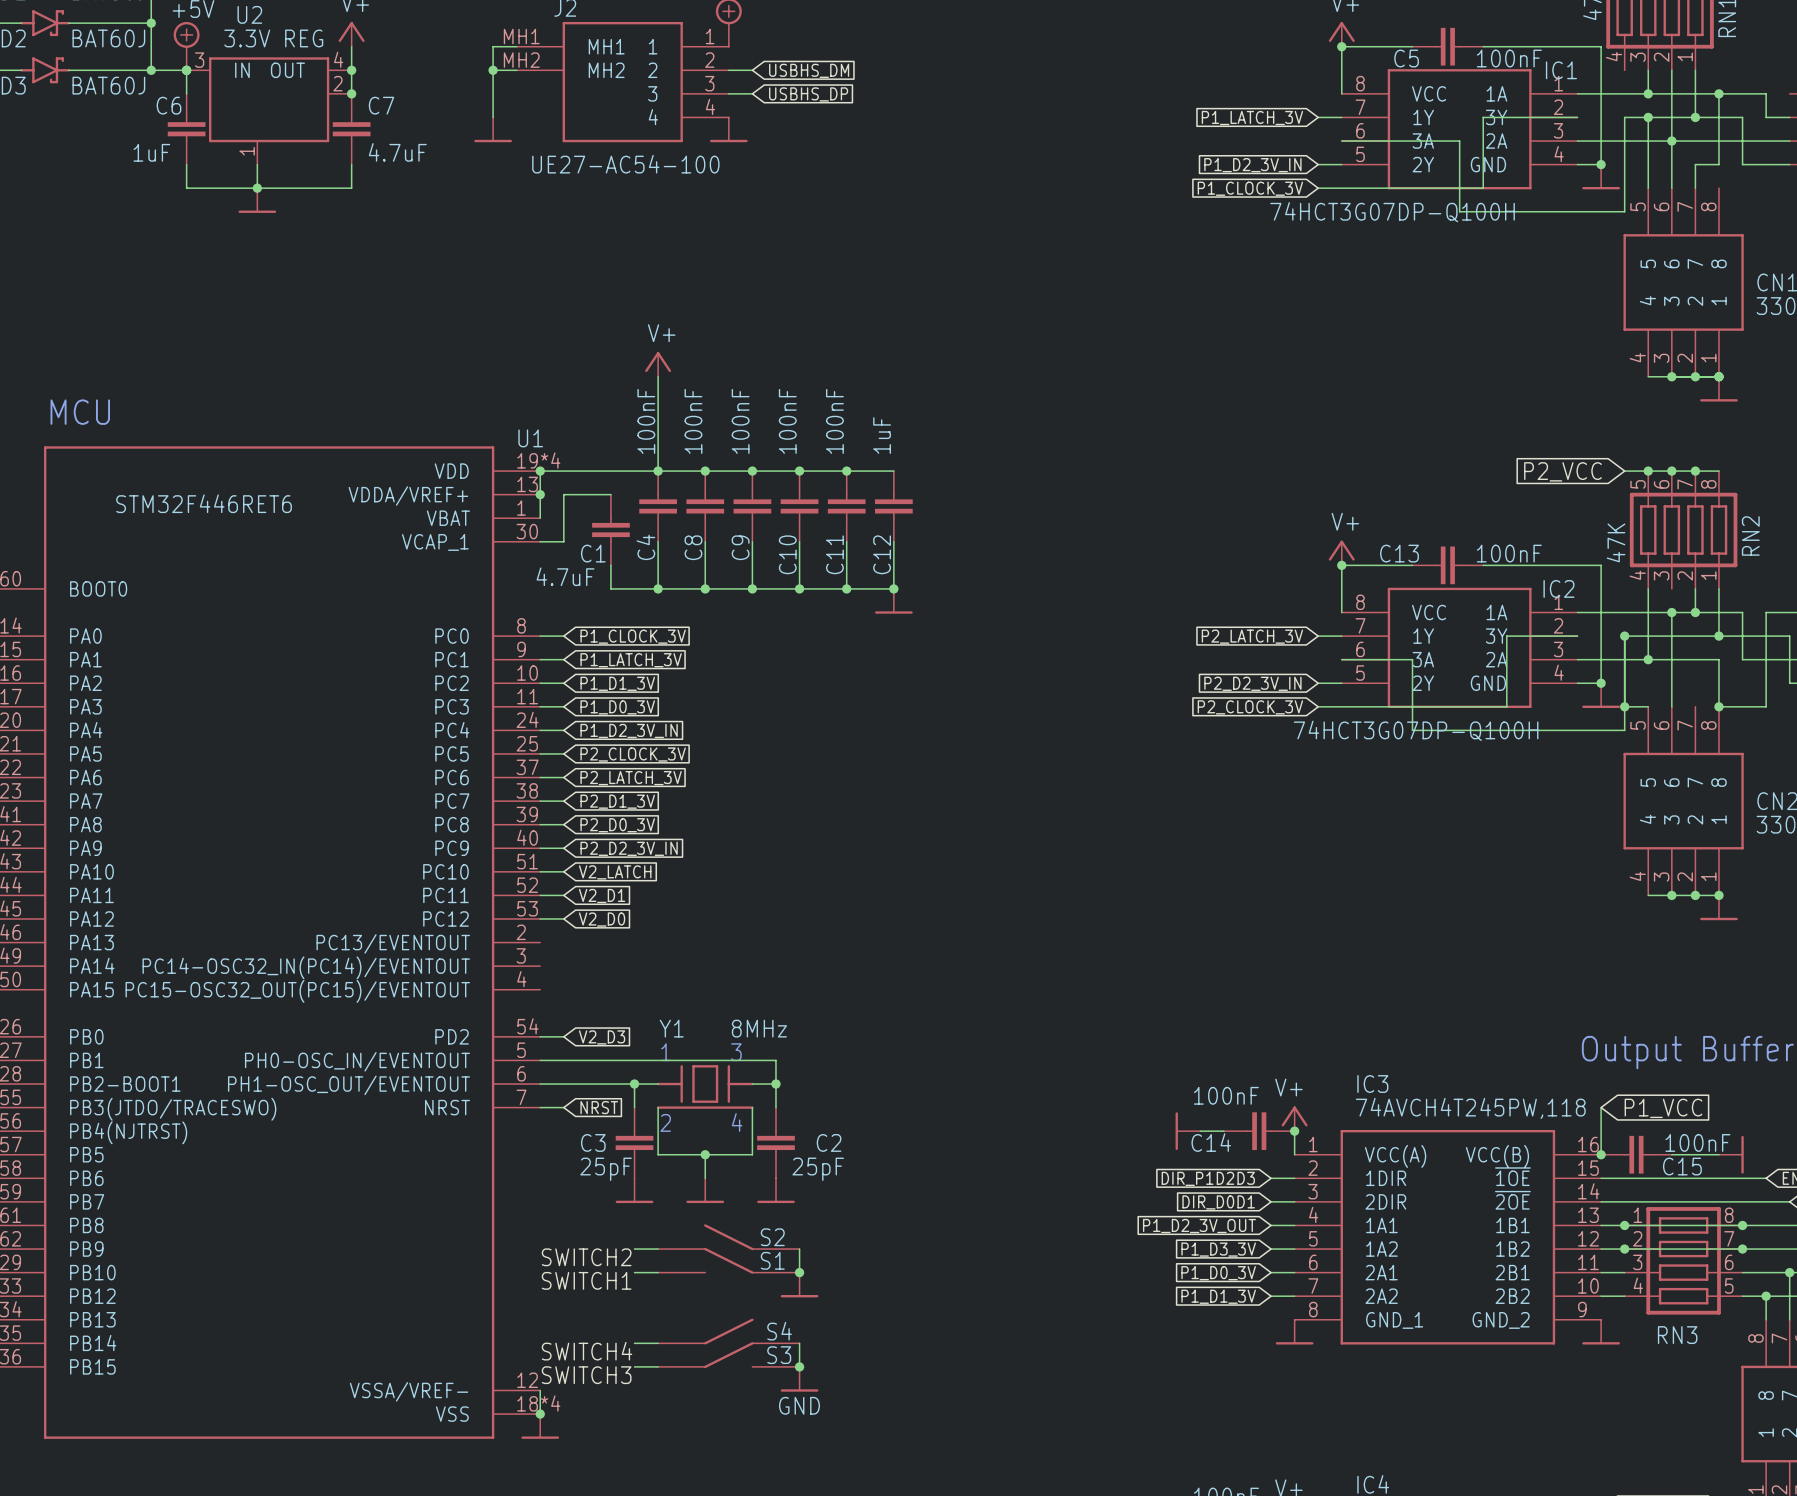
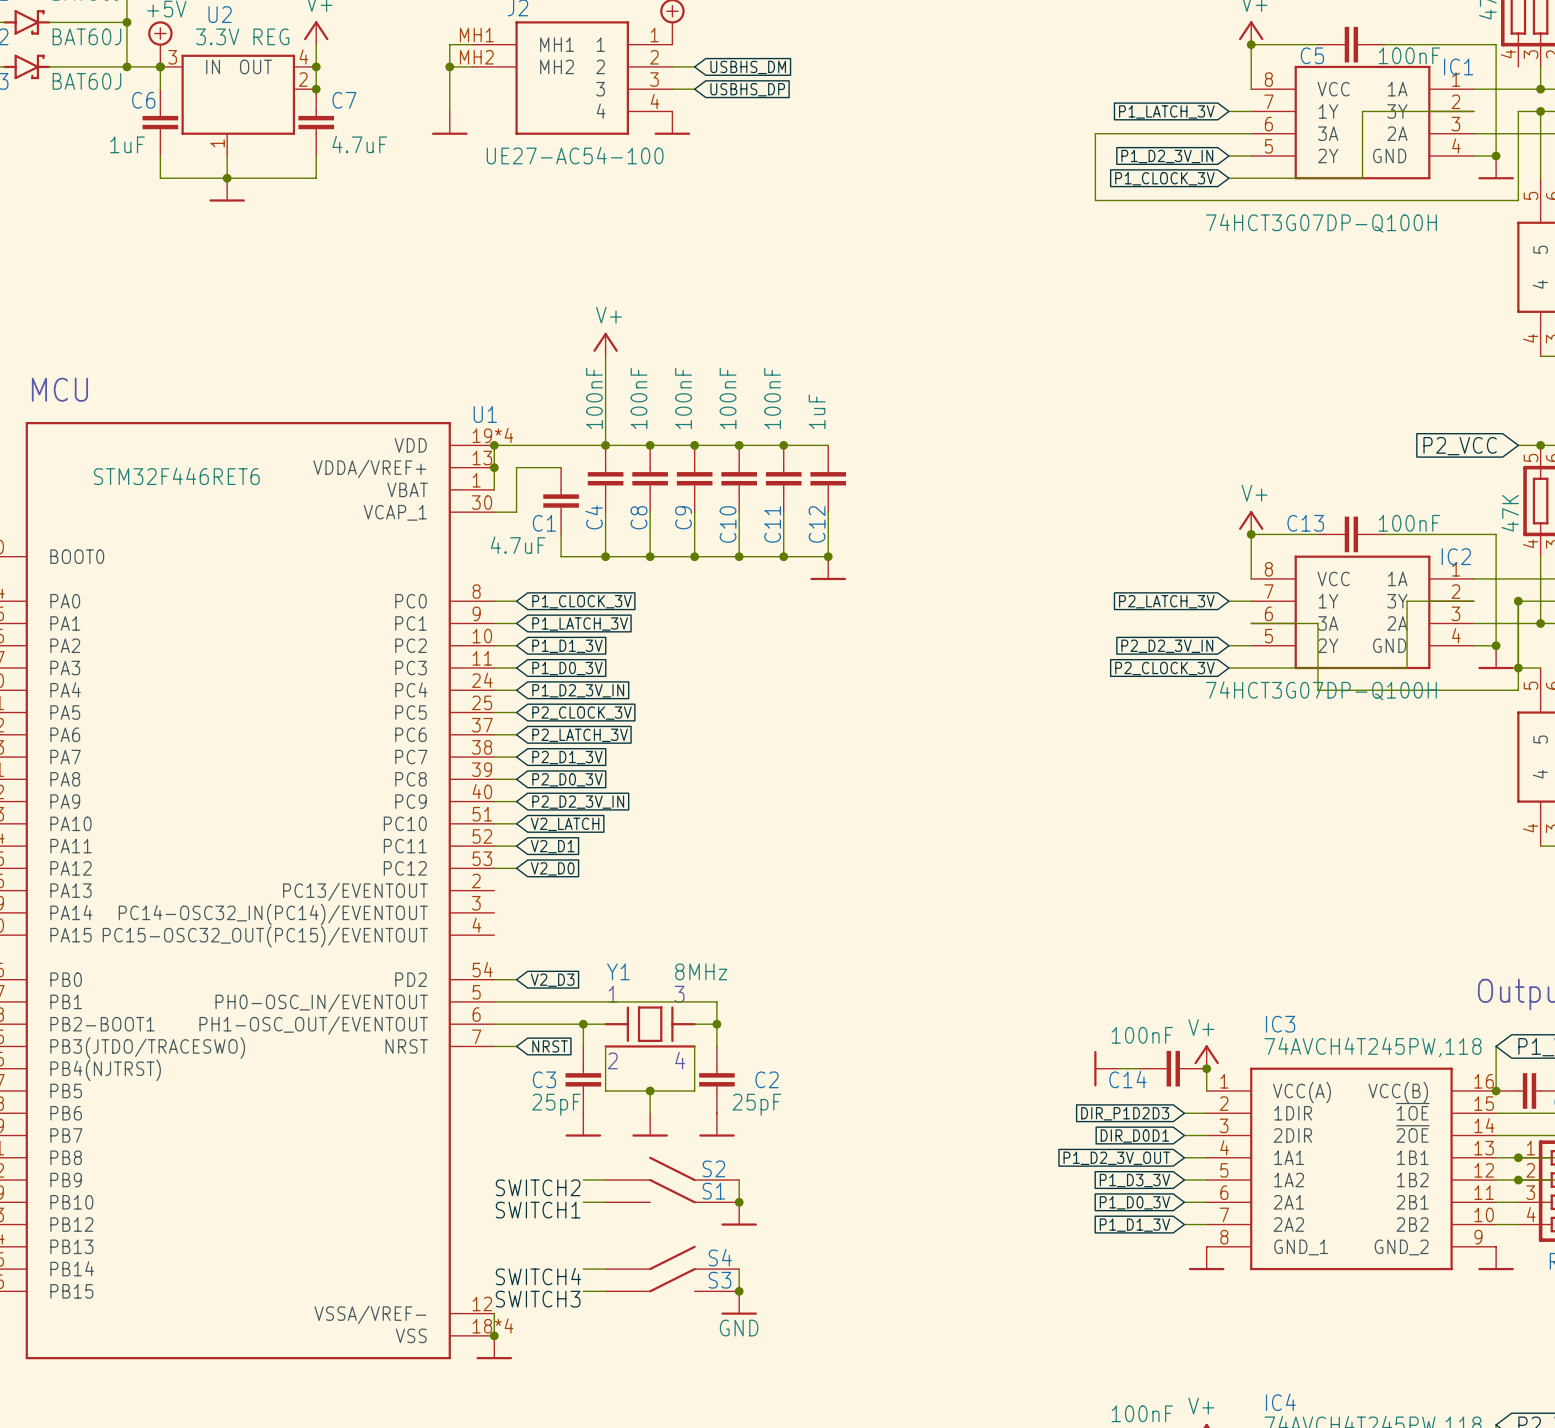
wire: (1483, 117) (1483, 188) (1459, 188) (1459, 211) -> (1384, 111) (1362, 111) (1362, 133)
wire: (1341, 141) (1459, 141) -> (1251, 133) (1095, 133) (1095, 200) (1362, 200)
IC1 value position: 74HCT3G07DP-Q100H (1392, 212) -> 74HCT3G07DP-Q100H (1321, 223)

